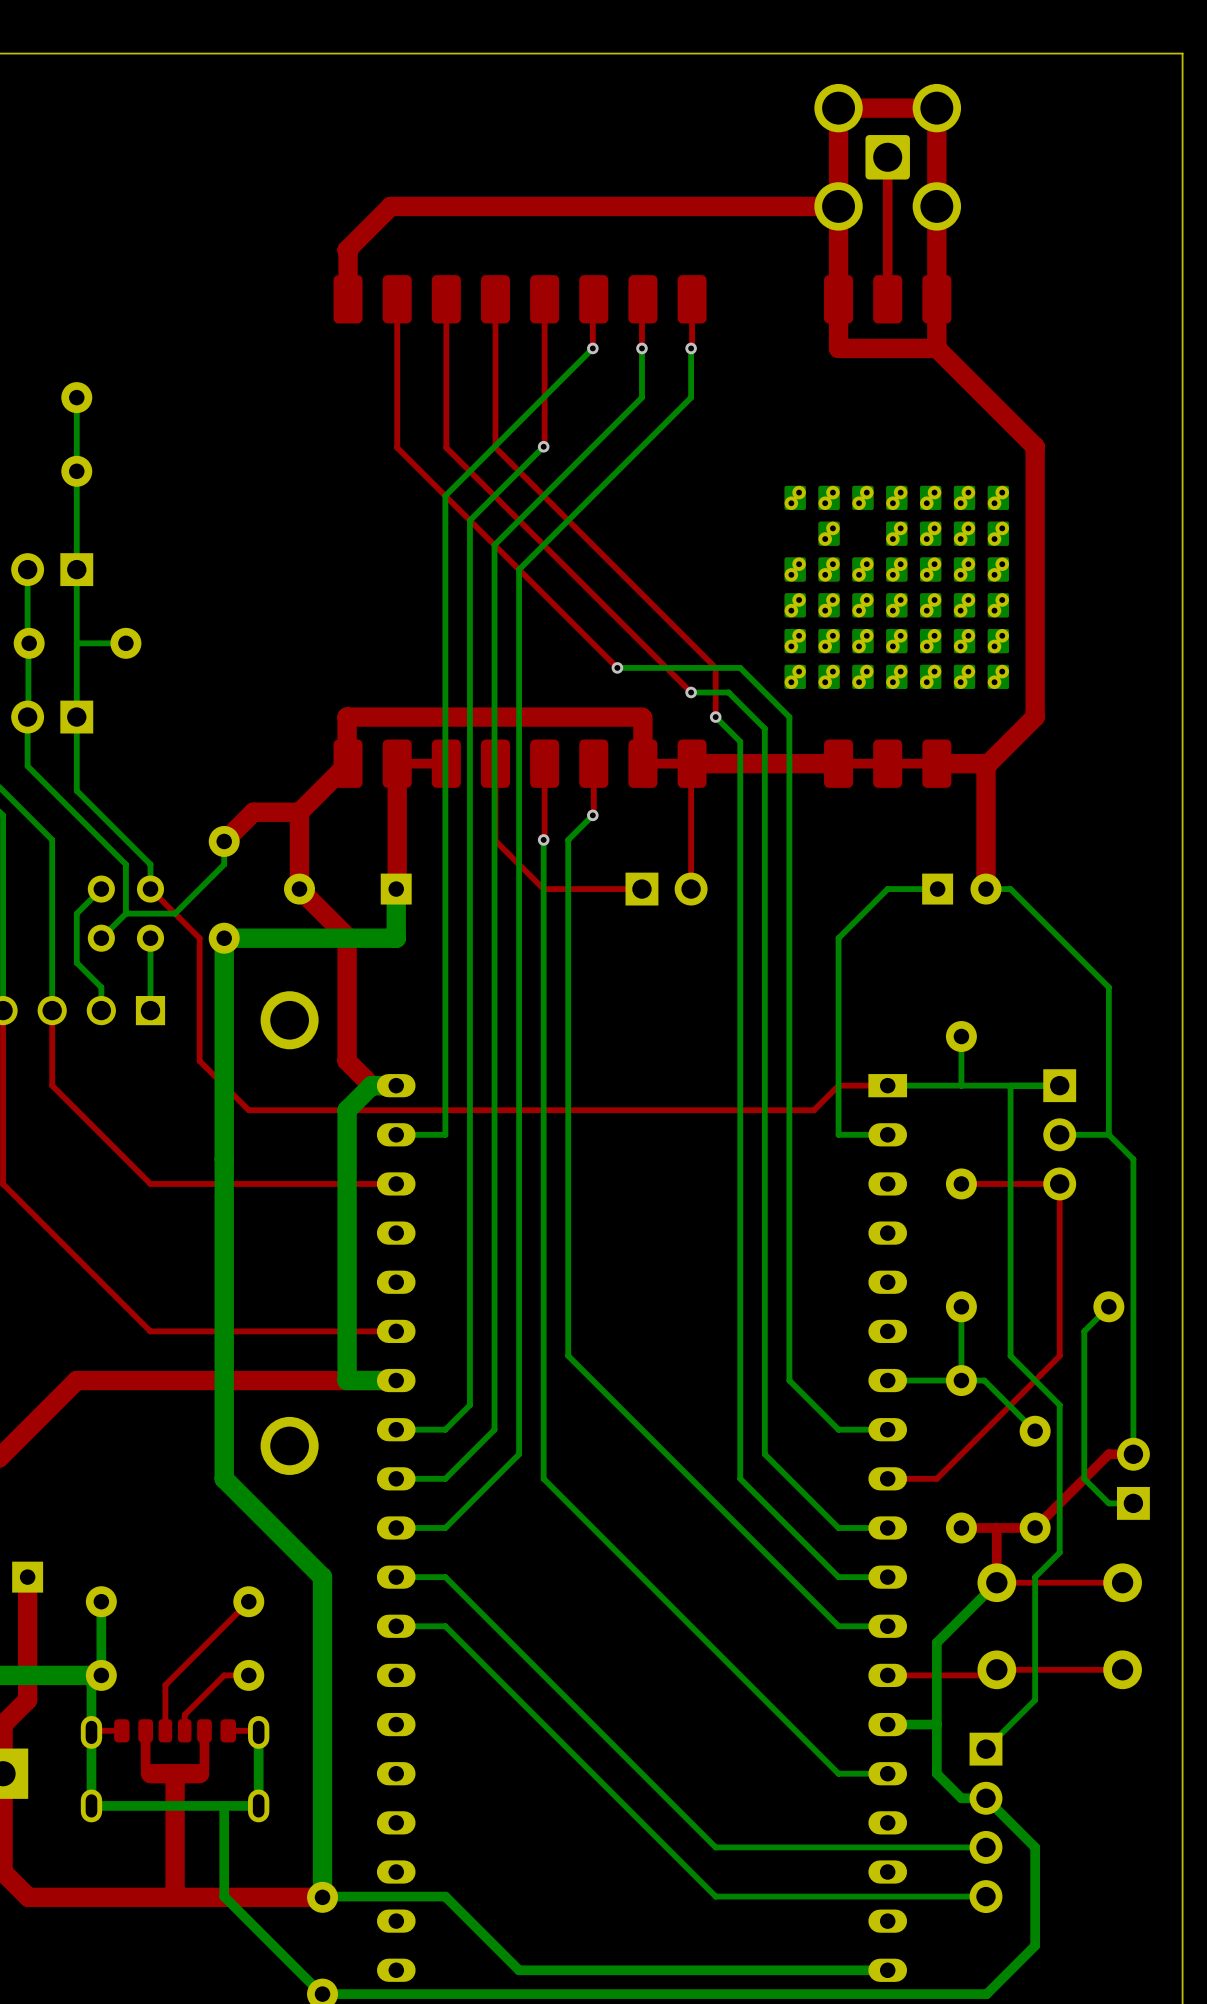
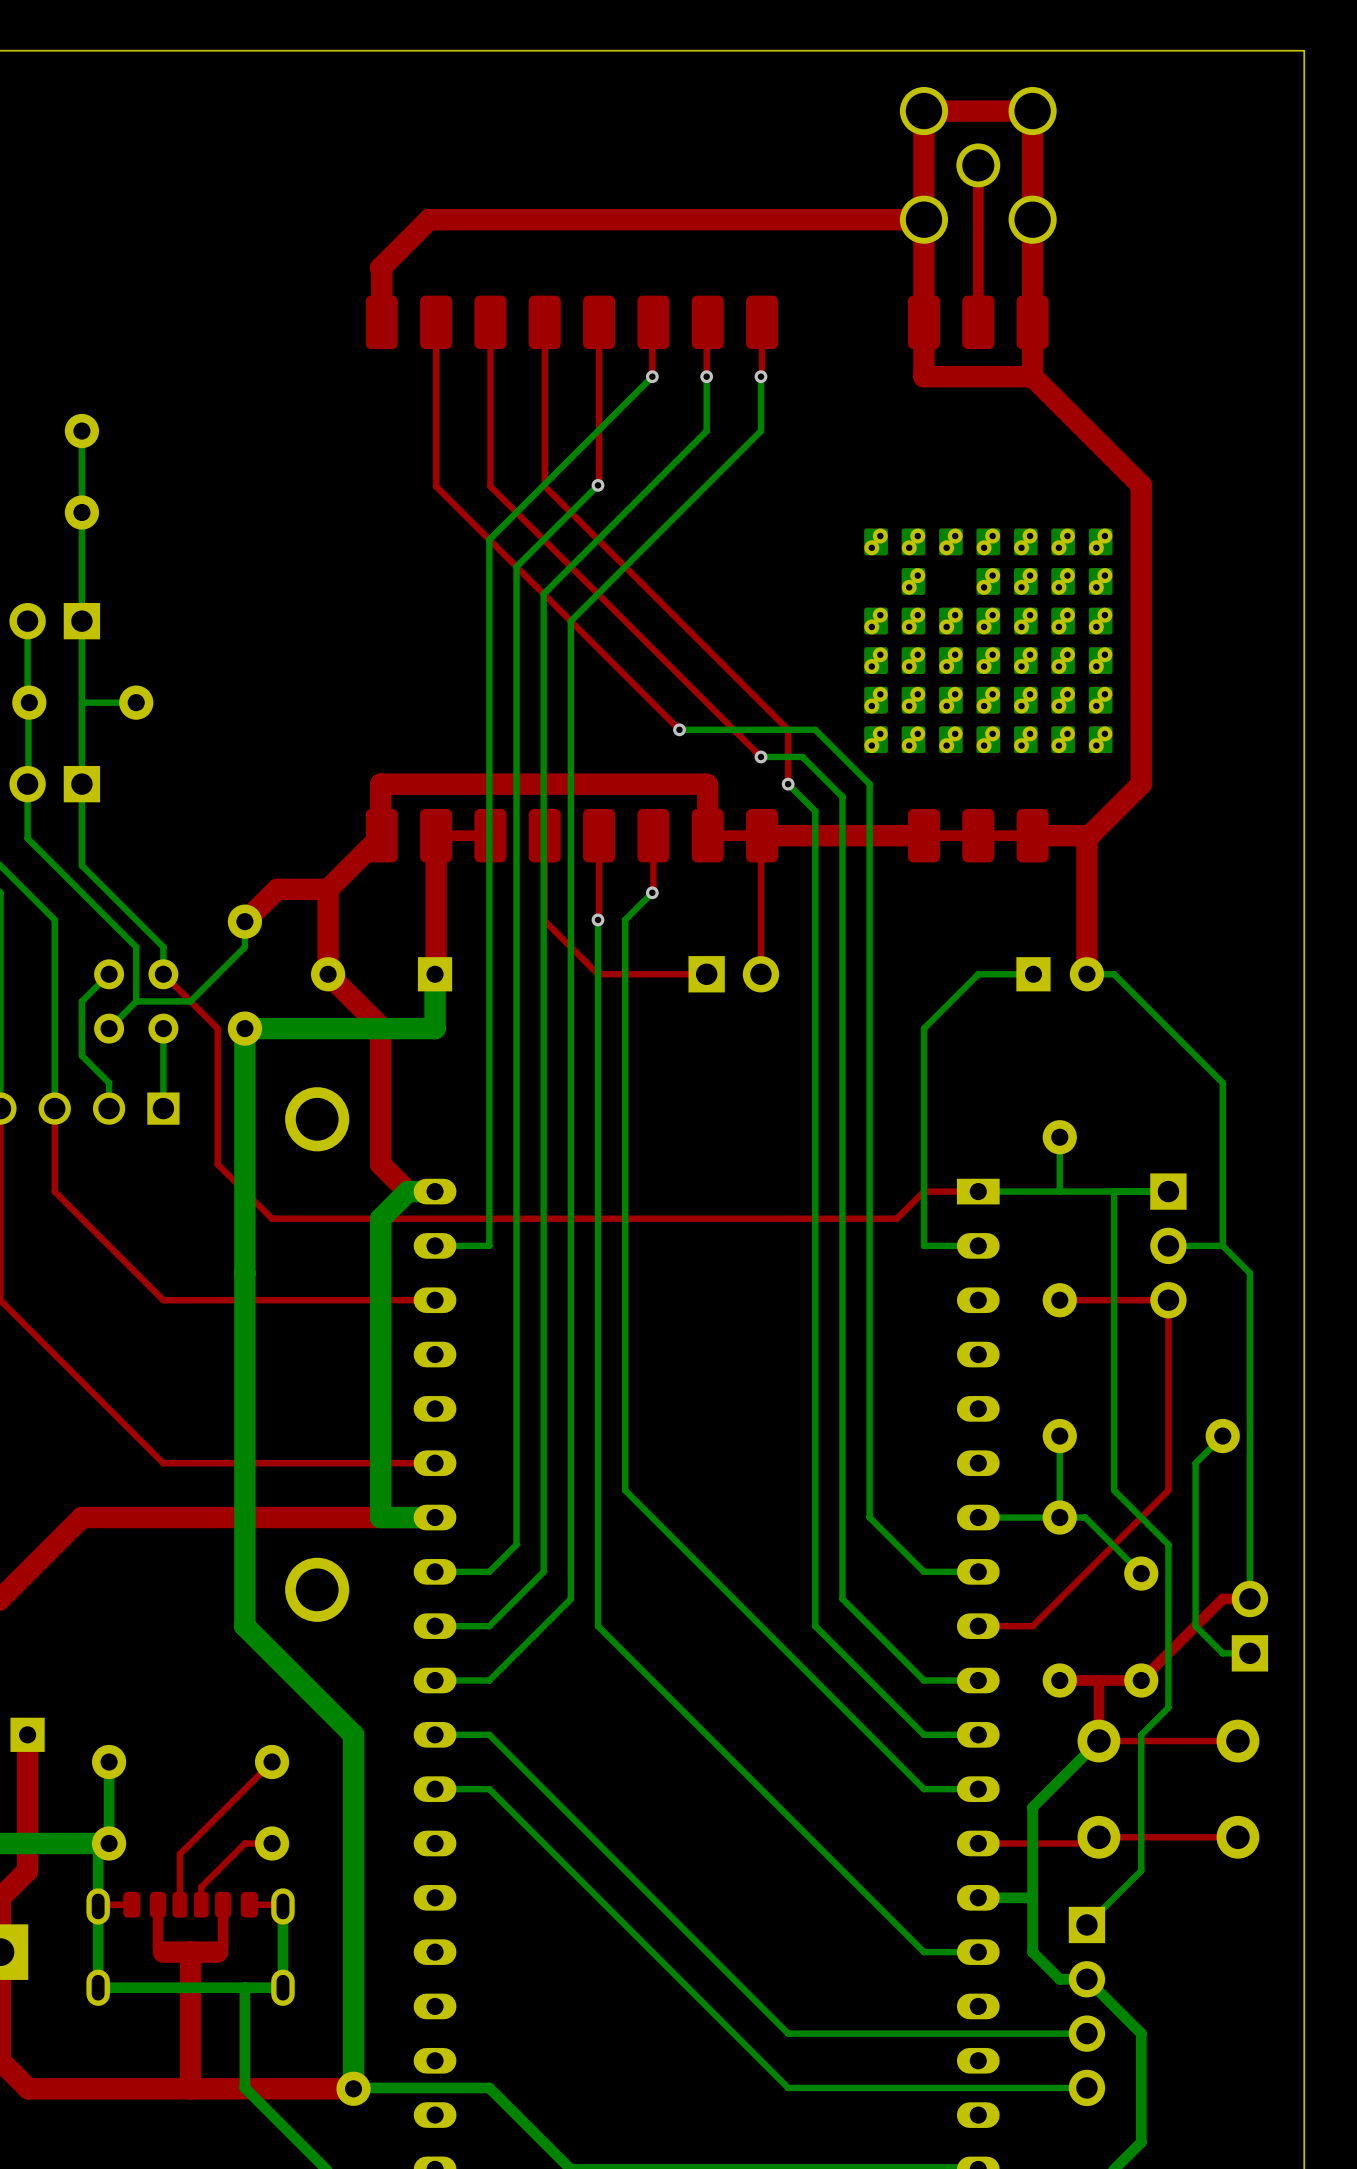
part footprint: [814, 83, 962, 231] -> [899, 86, 1057, 244]

